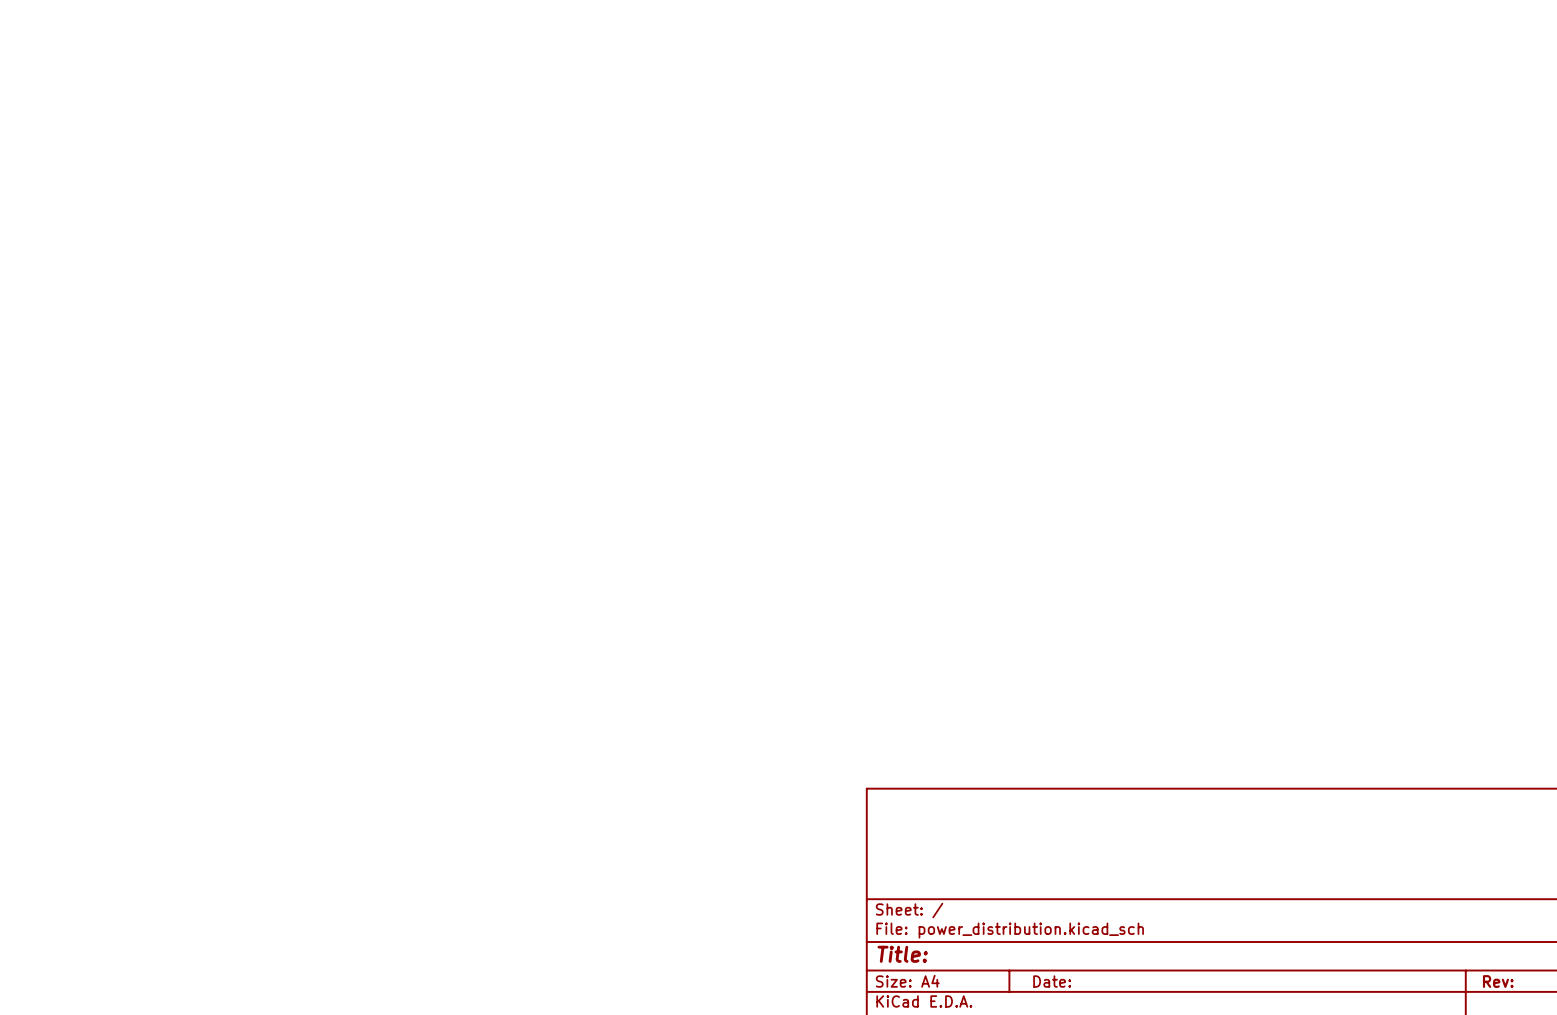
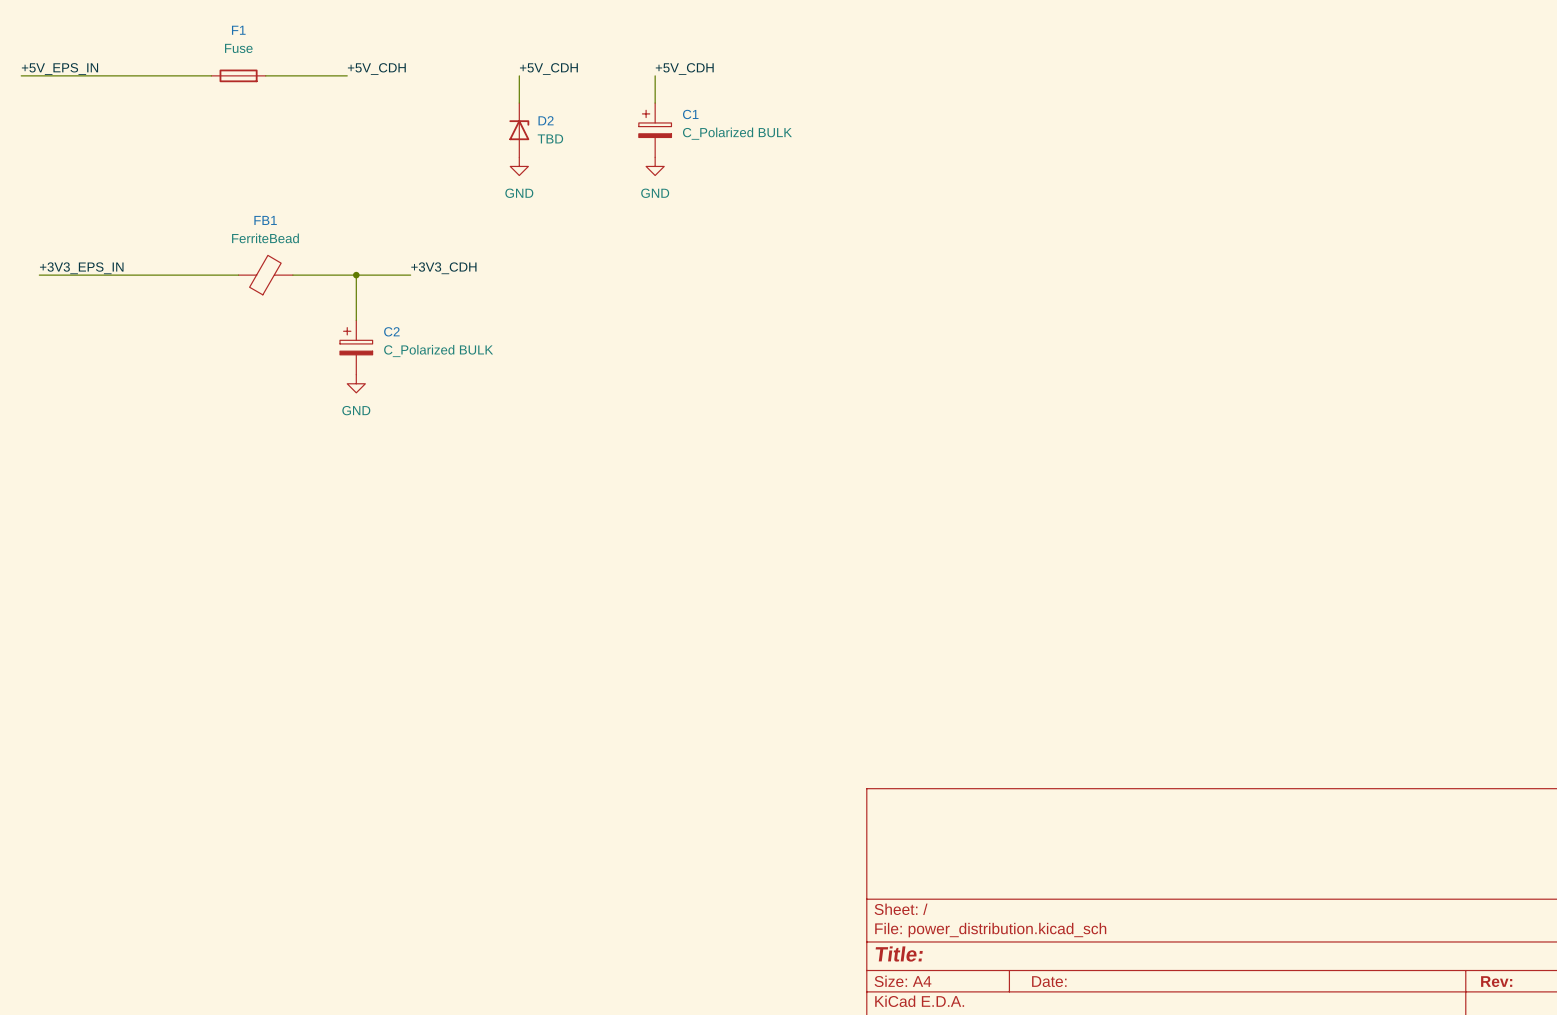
label: none -> +5V_EPS_IN (59, 69)
label: none -> +5V_CDH (376, 69)
label: none -> +5V_CDH (548, 69)
label: none -> +5V_CDH (684, 69)
wire: none -> (21, 75) (211, 75)
F1: none -> Fuse (238, 75)
wire: none -> (265, 75) (347, 75)
wire: none -> (519, 75) (519, 103)
wire: none -> (655, 75) (655, 103)
D2: none -> TBD (519, 130)
C1: none -> C_Polarized BULK (655, 130)
power symbol: none -> GND (519, 166)
power symbol: none -> GND (655, 166)
label: none -> +3V3_EPS_IN (81, 268)
label: none -> +3V3_CDH (443, 268)
wire: none -> (39, 275) (238, 275)
FB1: none -> FerriteBead (265, 275)
wire: none -> (292, 275) (410, 275)
wire: none -> (356, 275) (356, 320)
junction: none -> (356, 275)
C2: none -> C_Polarized BULK (356, 347)
power symbol: none -> GND (356, 383)

